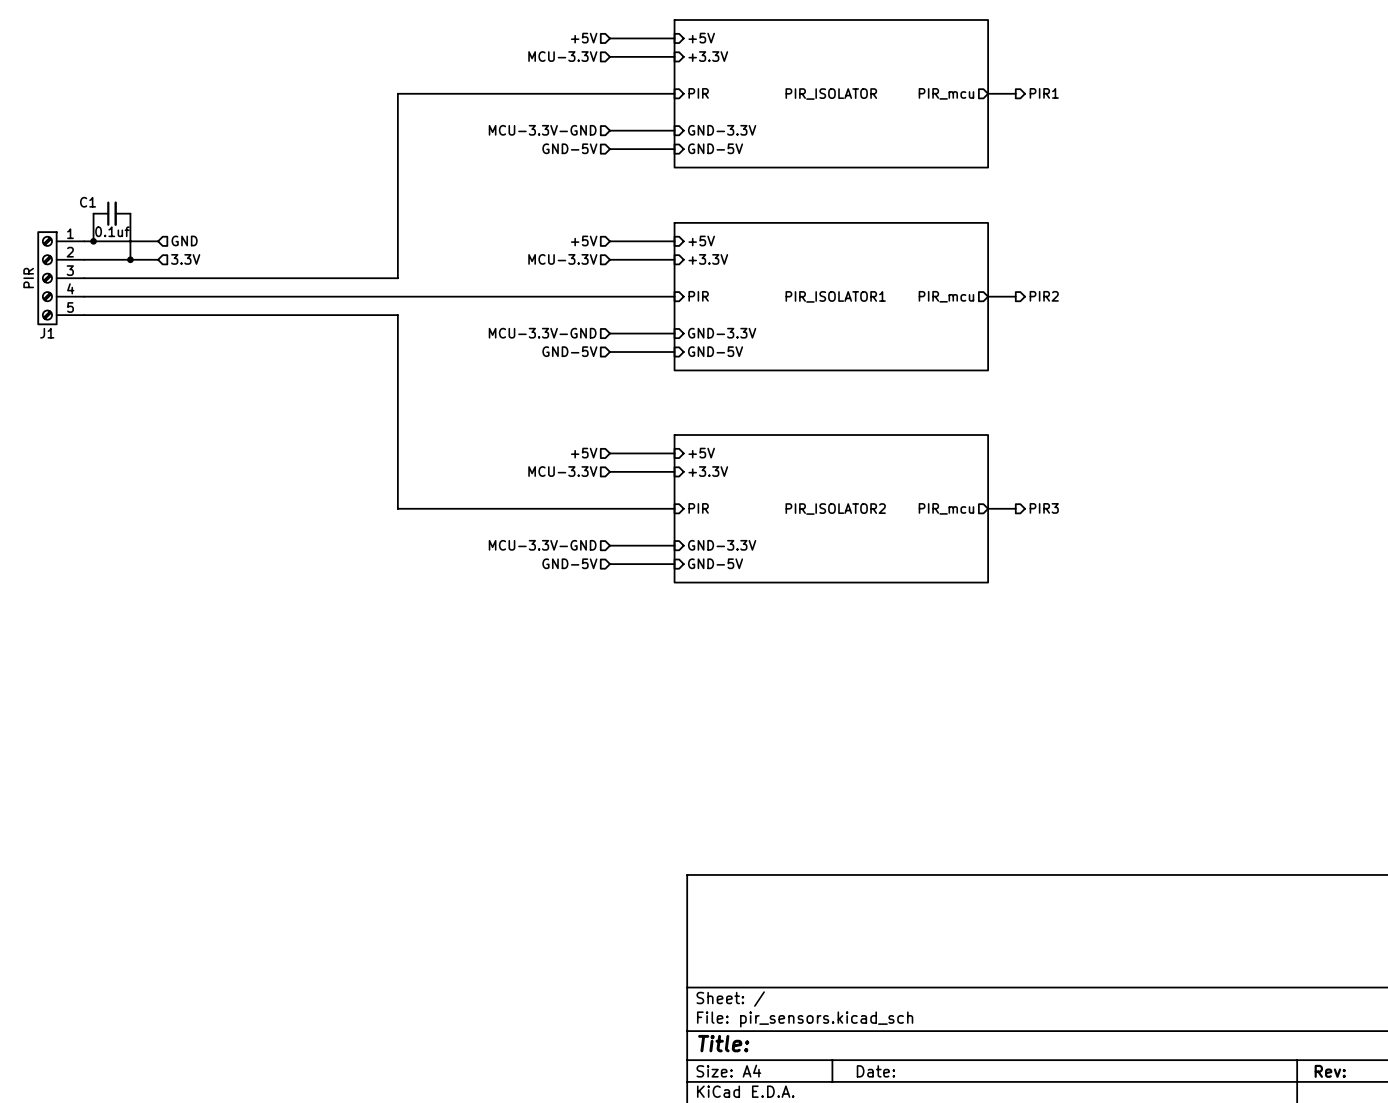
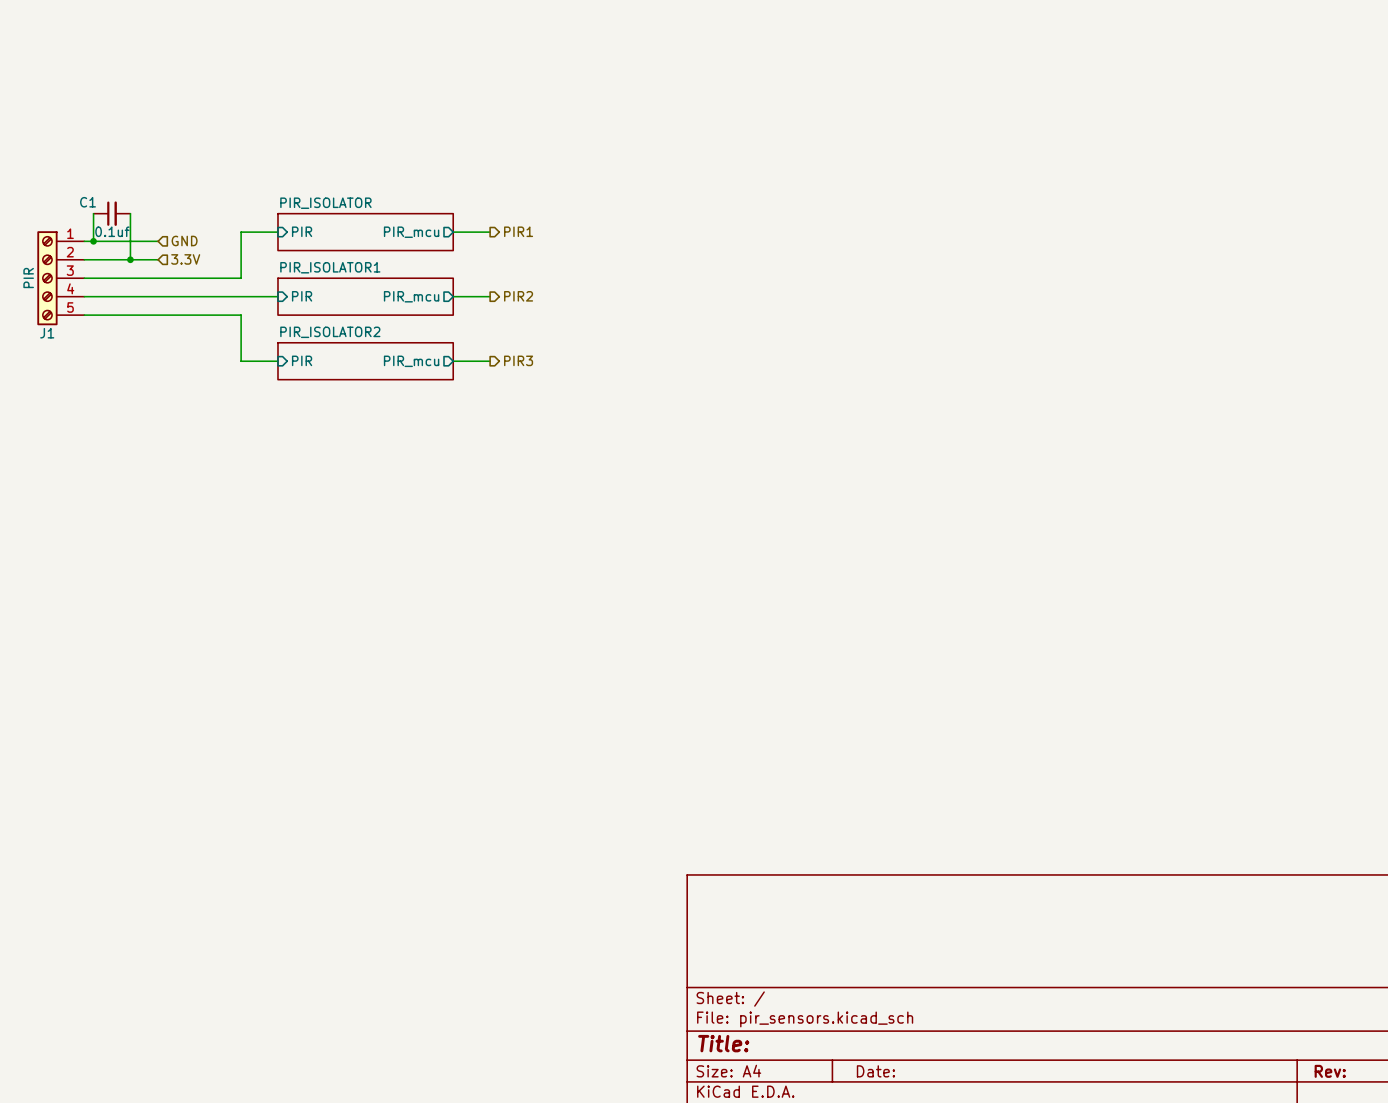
hierarchical label: +5V (584, 38) -> none
wire: (609, 38) (674, 38) -> none
sheet pin: +5V (701, 38) -> none
hierarchical label: MCU-3.3V (562, 56) -> none
wire: (609, 56) (674, 56) -> none
sheet pin: +3.3V (708, 56) -> none
wire: (674, 93) (397, 93) (397, 278) (241, 278) -> (277, 232) (241, 232) (241, 278)
sheet pin: PIR (698, 93) -> none
sheet PIR_ISOLATOR: (831, 93) -> none
sheet pin: PIR_mcu (946, 93) -> none
wire: (988, 93) (1015, 93) -> none
hierarchical label: PIR1 (1044, 93) -> none
hierarchical label: MCU-3.3V-GND (542, 130) -> none
wire: (609, 130) (674, 130) -> none
sheet pin: GND-3.3V (722, 130) -> none
hierarchical label: GND-5V (569, 148) -> none
sheet pin: GND-5V (715, 148) -> none
wire: (609, 149) (674, 149) -> none
sheet PIR_ISOLATOR1 shape: [673, 222, 989, 372] -> [277, 277, 454, 316]
sheet pin: none -> PIR (302, 231)
hierarchical label: none -> PIR1 (518, 231)
sheet PIR_ISOLATOR: none -> (365, 232)
sheet pin: none -> PIR_mcu (411, 232)
wire: none -> (453, 232) (490, 232)
hierarchical label: +5V (584, 240) -> none
sheet pin: +5V (701, 240) -> none
wire: (609, 241) (674, 241) -> none
hierarchical label: MCU-3.3V (562, 259) -> none
wire: (609, 259) (674, 259) -> none
sheet pin: +3.3V (708, 259) -> none
wire: (277, 296) (453, 296) -> none
sheet pin: none -> PIR (302, 296)
sheet pin: none -> PIR_mcu (411, 296)
wire: (490, 296) (674, 296) -> none
hierarchical label: none -> PIR2 (518, 296)
sheet pin: PIR (698, 296) -> none
sheet PIR_ISOLATOR1 name position: PIR_ISOLATOR1 (835, 296) -> PIR_ISOLATOR1 (330, 267)
sheet pin: PIR_mcu (946, 296) -> none
wire: (988, 296) (1015, 296) -> none
hierarchical label: PIR2 (1044, 296) -> none
wire: (241, 315) (397, 315) (397, 508) (674, 508) -> (241, 315) (241, 361) (277, 361)
hierarchical label: MCU-3.3V-GND (542, 333) -> none
wire: (609, 333) (674, 333) -> none
sheet pin: GND-3.3V (722, 333) -> none
hierarchical label: GND-5V (569, 351) -> none
sheet pin: GND-5V (715, 351) -> none
wire: (609, 352) (674, 352) -> none
sheet pin: none -> PIR (302, 360)
hierarchical label: none -> PIR3 (518, 360)
sheet pin: none -> PIR_mcu (411, 361)
wire: none -> (453, 361) (490, 361)
sheet PIR_ISOLATOR2 shape: [673, 434, 989, 584] -> [277, 342, 454, 381]
hierarchical label: +5V (584, 453) -> none
wire: (609, 453) (674, 453) -> none
sheet pin: +5V (701, 453) -> none
hierarchical label: MCU-3.3V (562, 471) -> none
wire: (609, 471) (674, 471) -> none
sheet pin: +3.3V (708, 471) -> none
sheet pin: PIR (698, 508) -> none
sheet pin: PIR_mcu (946, 508) -> none
wire: (988, 508) (1015, 508) -> none
hierarchical label: PIR3 (1044, 508) -> none
sheet PIR_ISOLATOR2 name position: PIR_ISOLATOR2 (835, 509) -> PIR_ISOLATOR2 (330, 332)
hierarchical label: MCU-3.3V-GND (542, 545) -> none
wire: (609, 545) (674, 545) -> none
sheet pin: GND-3.3V (722, 545) -> none
hierarchical label: GND-5V (569, 563) -> none
sheet pin: GND-5V (715, 563) -> none
wire: (609, 564) (674, 564) -> none

